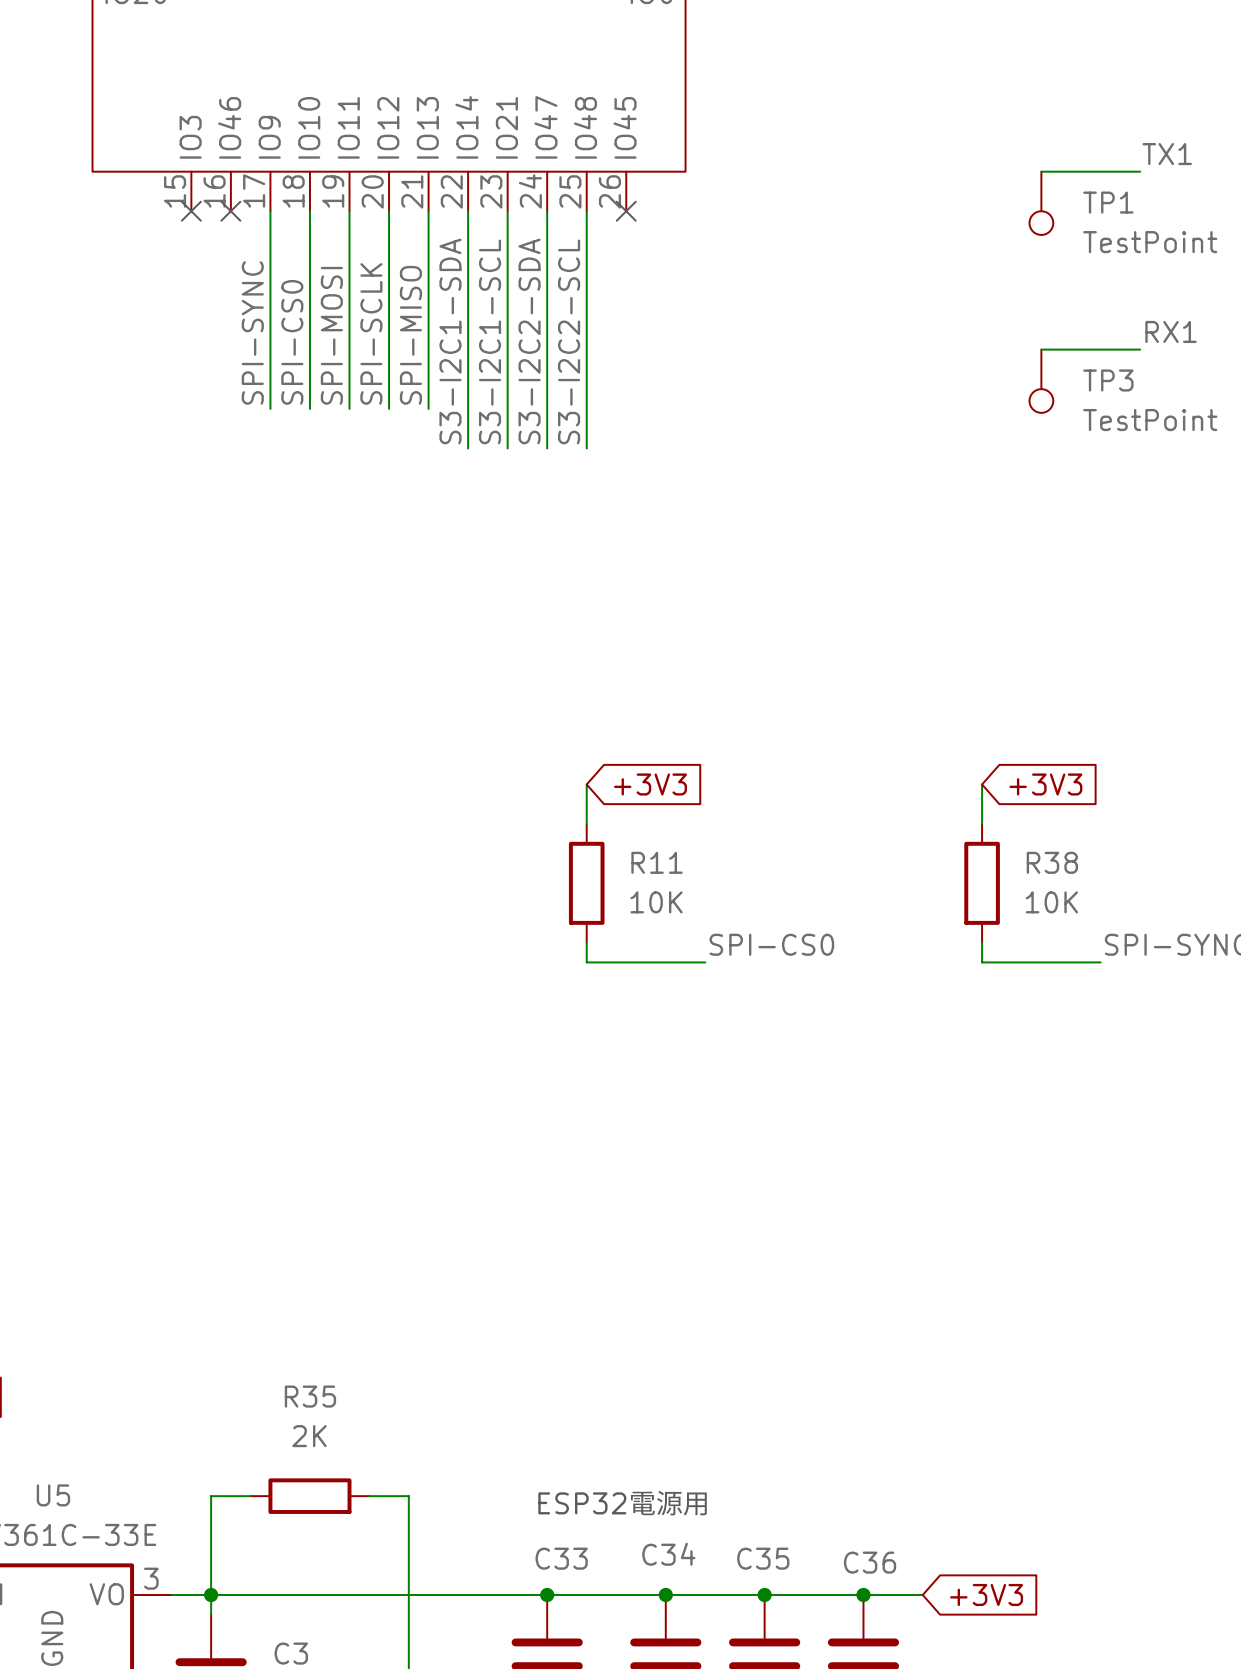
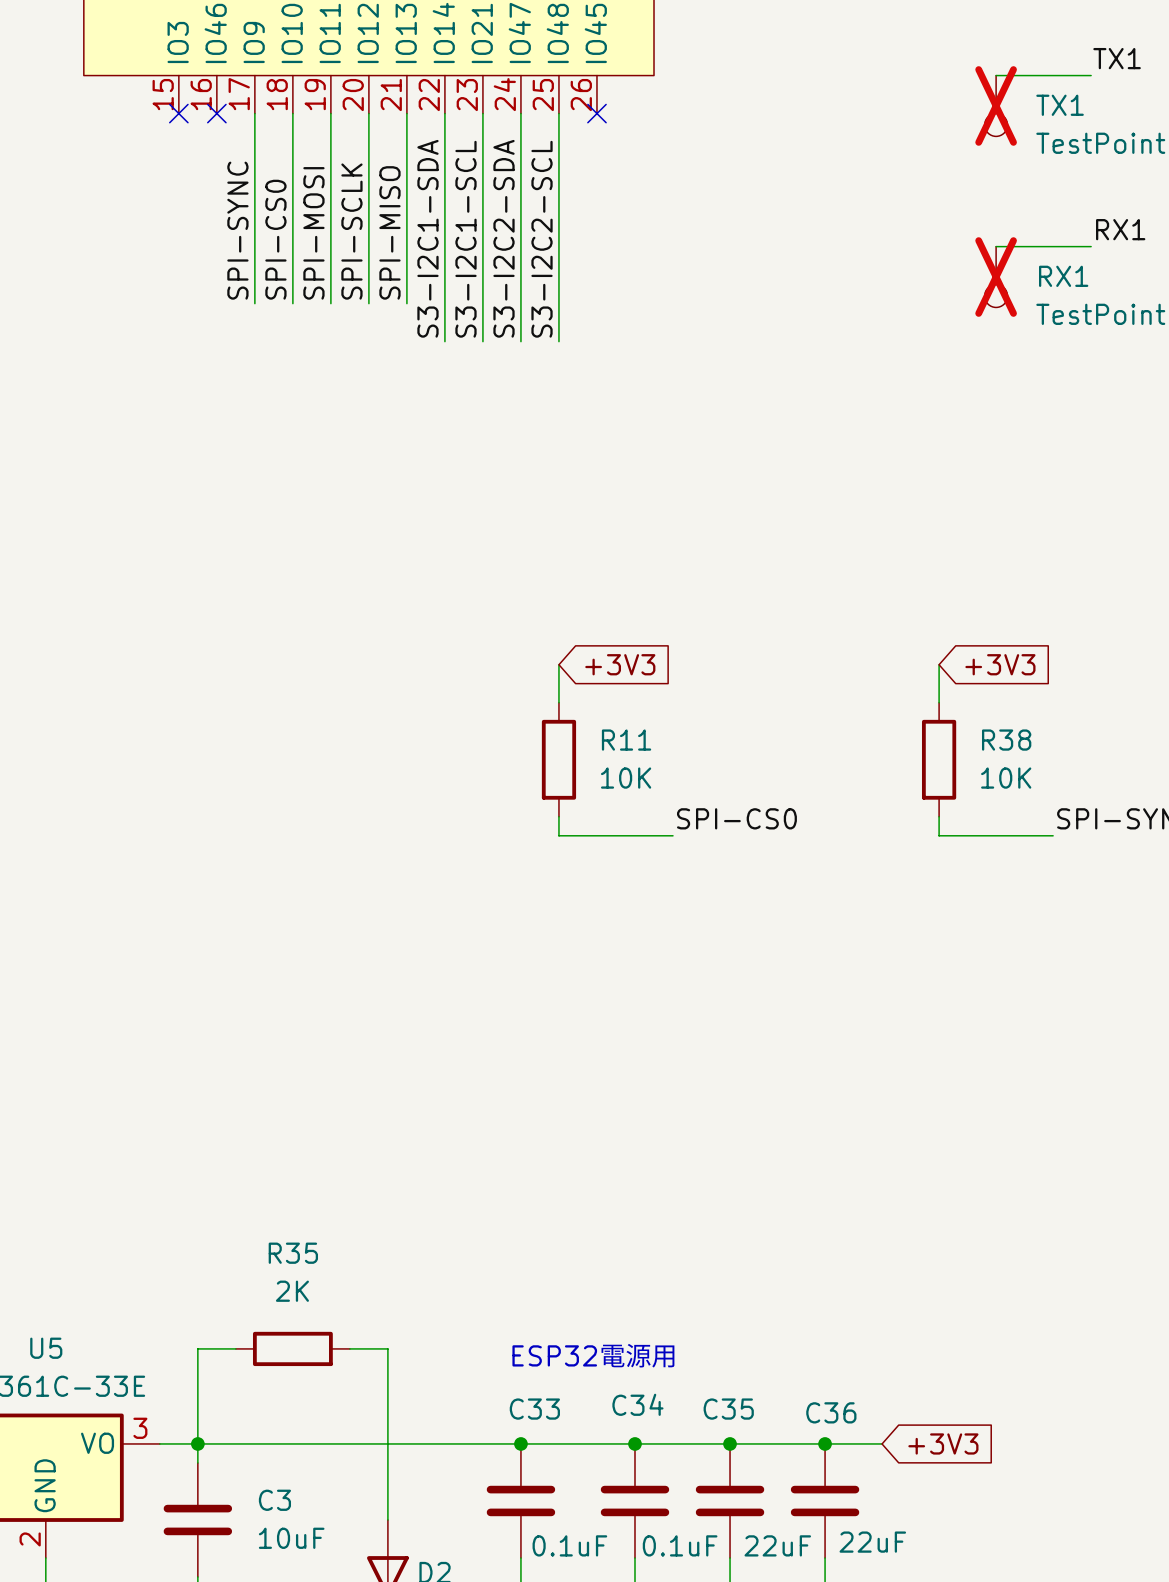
TP1 name: TP1 (1108, 202) -> TX1 (1060, 105)
TP1 do-not-place cross: none -> (996, 105)
TP3 name: TP3 (1108, 380) -> RX1 (1063, 276)
TP3 do-not-place cross: none -> (996, 277)

